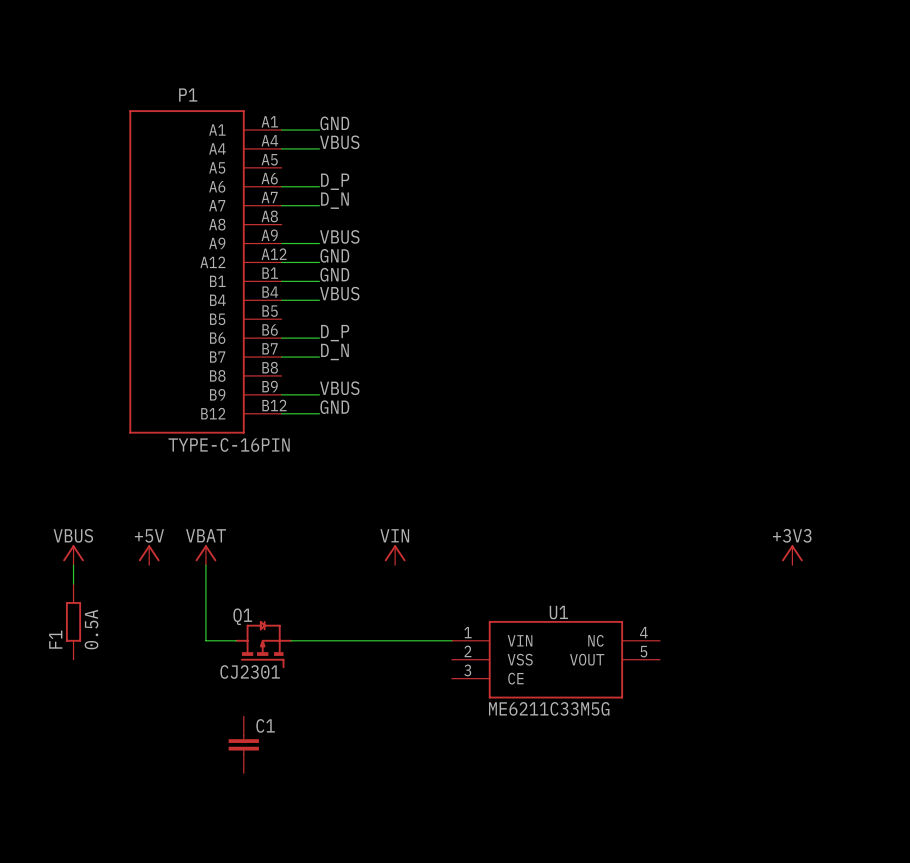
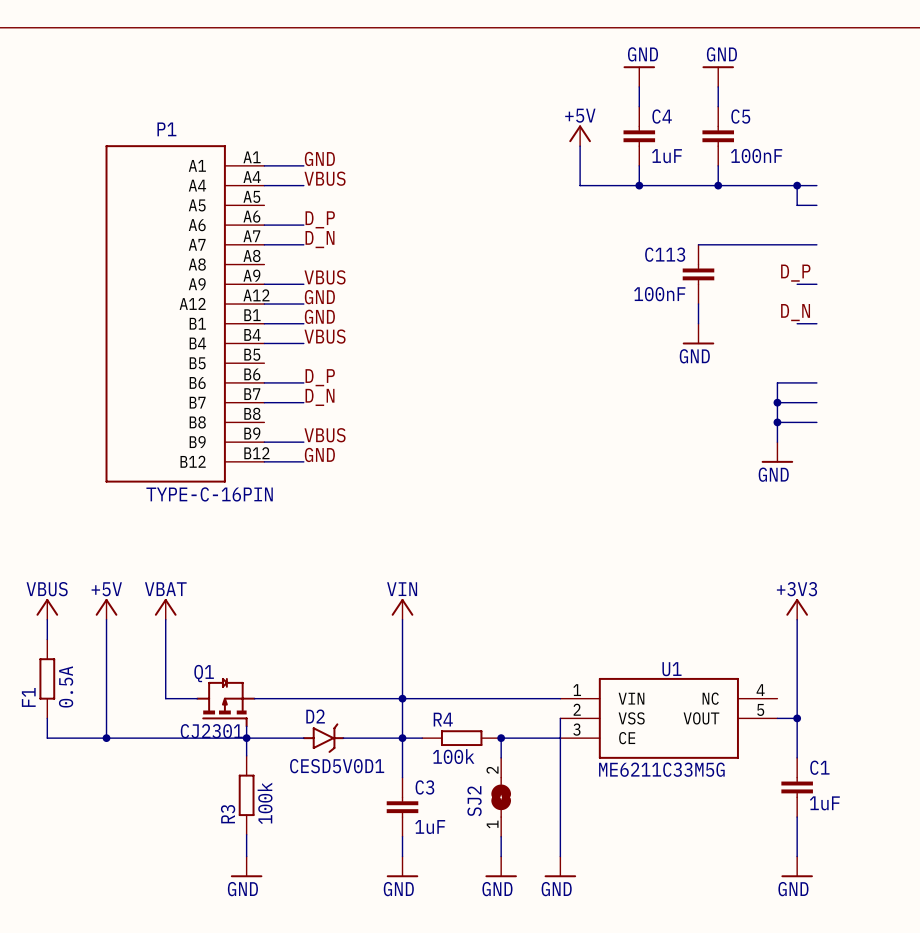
power symbol: none -> GND (639, 76)
power symbol: none -> GND (718, 76)
wire: none -> (639, 86) (639, 106)
wire: none -> (718, 86) (718, 106)
power symbol: none -> +5V (580, 135)
C4: none -> 1uF (639, 136)
C5: none -> 100nF (718, 136)
wire: none -> (580, 146) (580, 185) (816, 185)
wire: none -> (639, 165) (639, 185)
wire: none -> (718, 165) (718, 185)
junction: none -> (639, 185)
junction: none -> (718, 185)
wire: none -> (797, 185) (797, 205) (816, 205)
junction: none -> (797, 185)
wire: none -> (698, 244) (816, 244)
label: none -> D_P (795, 273)
C113: none -> 100nF (698, 274)
wire: none -> (797, 284) (816, 284)
wire: none -> (698, 304) (698, 323)
label: none -> D_N (795, 312)
wire: none -> (797, 323) (816, 323)
power symbol: none -> GND (698, 334)
wire: none -> (816, 382) (777, 382) (777, 442)
wire: none -> (777, 402) (816, 402)
junction: none -> (777, 402)
wire: none -> (777, 422) (816, 422)
junction: none -> (777, 422)
power symbol: none -> GND (777, 452)
power symbol position: +5V (149, 555) -> +5V (106, 609)
power symbol position: VBAT (205, 555) -> VBAT (165, 609)
power symbol position: VIN (395, 555) -> VIN (402, 609)
wire: none -> (106, 619) (106, 738)
wire: (205, 565) (205, 640) -> (165, 619) (165, 698) (185, 698)
wire: none -> (402, 619) (402, 777)
wire: none -> (797, 619) (797, 757)
junction: none -> (402, 698)
wire: none -> (441, 698) (560, 698)
Q1 position: (263, 644) -> (225, 702)
wire: none -> (47, 718) (47, 738) (303, 738)
U1 position: (555, 659) -> (668, 718)
wire: none -> (560, 718) (560, 856)
wire: none -> (777, 718) (797, 718)
junction: none -> (797, 718)
wire: none -> (246, 726) (246, 755)
junction: none -> (106, 738)
junction: none -> (246, 738)
D2: none -> CESD5V0D1 (323, 738)
wire: none -> (343, 738) (422, 738)
junction: none -> (402, 738)
R4: none -> 100k (461, 738)
junction: none -> (501, 738)
wire: none -> (560, 738) (501, 738) (501, 757)
R3: none -> 100k (246, 795)
SJ2: none -> (501, 797)
C1 value: none -> 1uF (824, 803)
C1 position: (243, 744) -> (797, 787)
C3: none -> 1uF (402, 807)
wire: none -> (797, 817) (797, 856)
wire: none -> (246, 834) (246, 856)
wire: none -> (402, 836) (402, 856)
wire: none -> (501, 836) (501, 856)
power symbol: none -> GND (246, 866)
power symbol: none -> GND (402, 866)
power symbol: none -> GND (501, 866)
power symbol: none -> GND (560, 866)
power symbol: none -> GND (797, 866)

